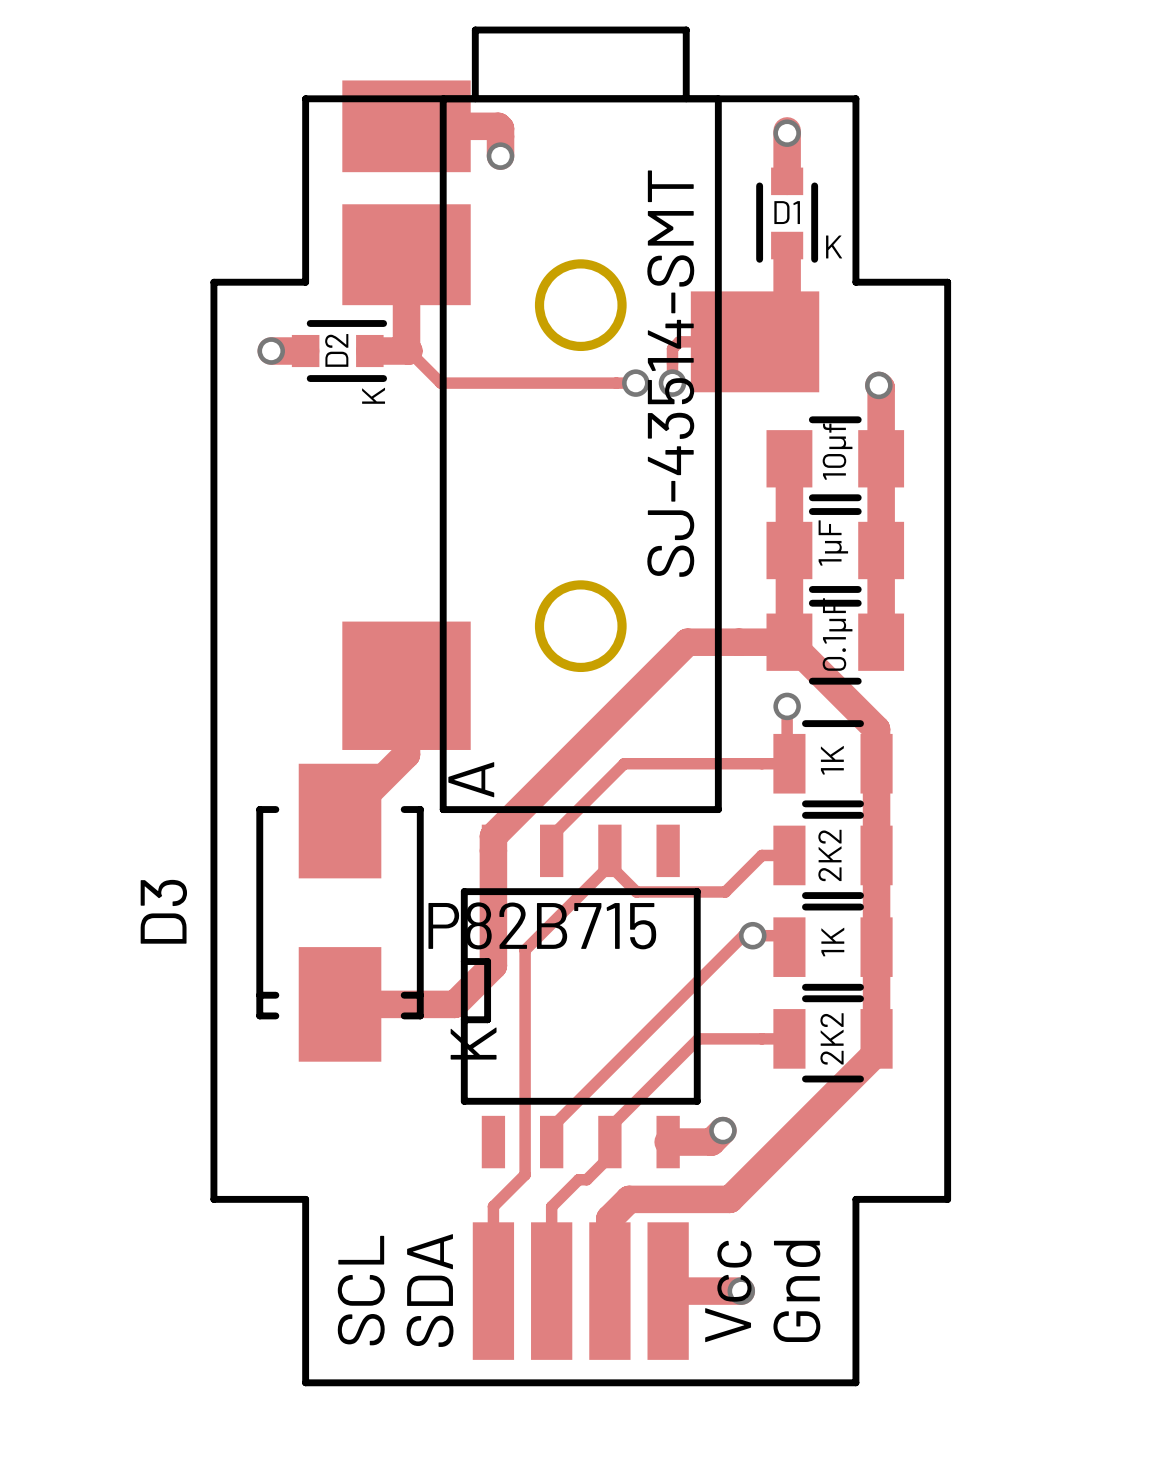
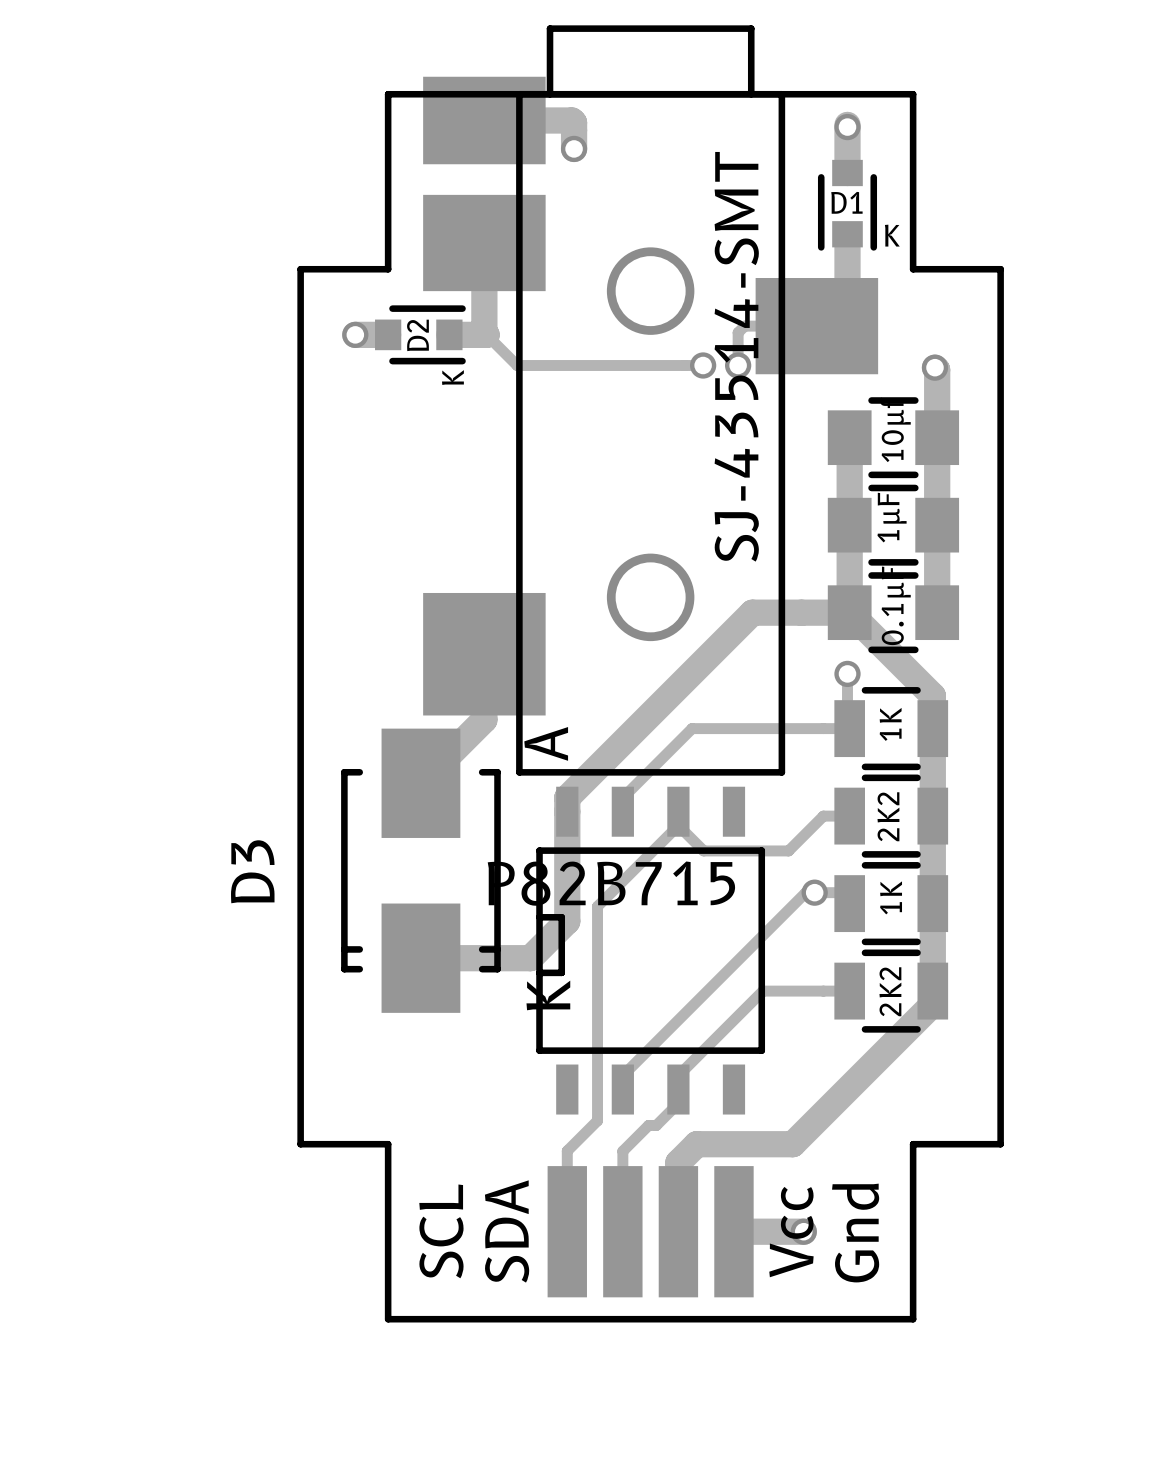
track: (722, 1130) (711, 1142) (668, 1142) -> none
via: (722, 1130) -> none

